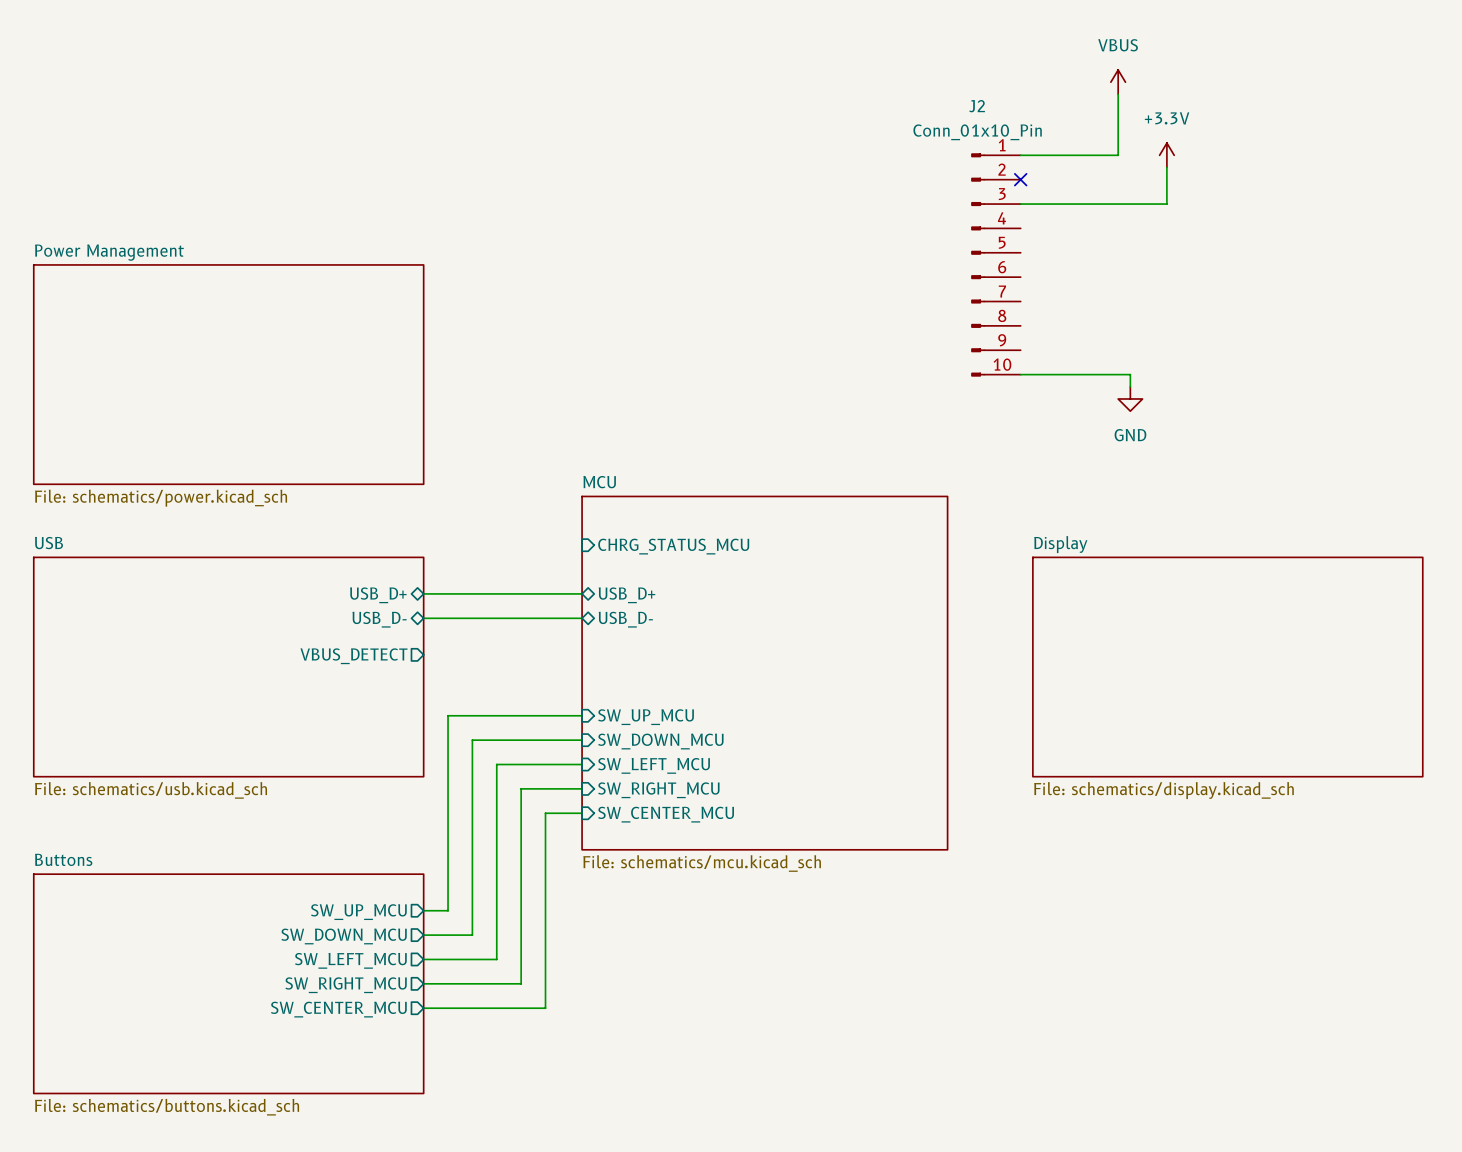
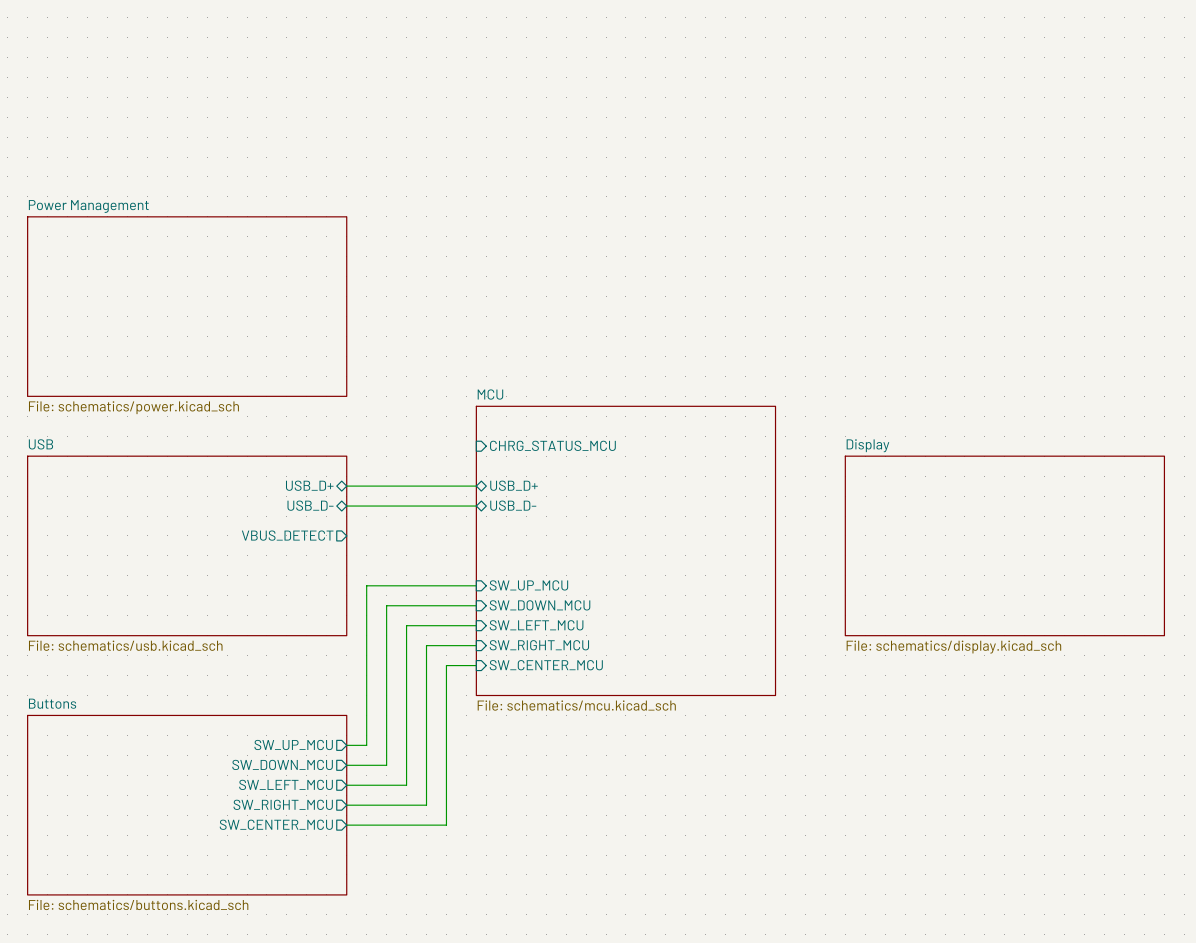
power symbol: VBUS (1118, 82) -> none
wire: (1118, 94) (1118, 155) (1020, 155) -> none
power symbol: +3.3V (1166, 155) -> none
wire: (1166, 167) (1166, 204) (1020, 204) -> none
no-connect mark: (1020, 179) -> none
J2: Conn_01x10_Pin (995, 264) -> none
wire: (1020, 374) (1130, 374) (1130, 386) -> none
power symbol: GND (1130, 398) -> none

